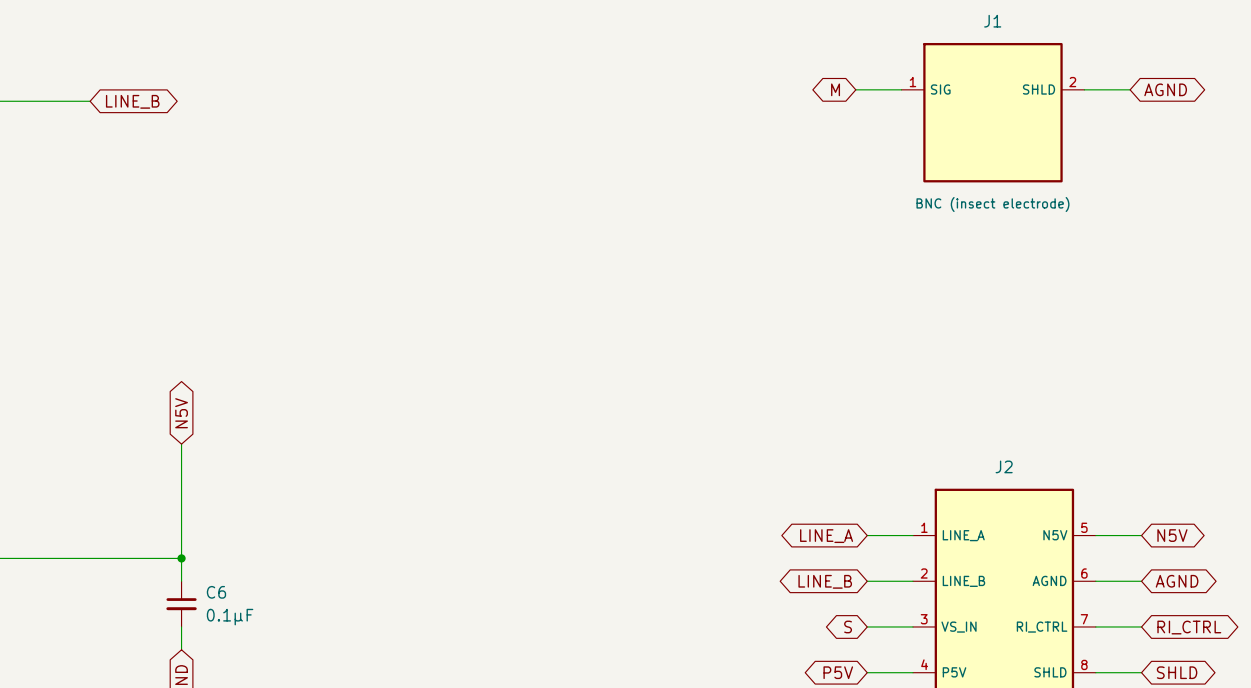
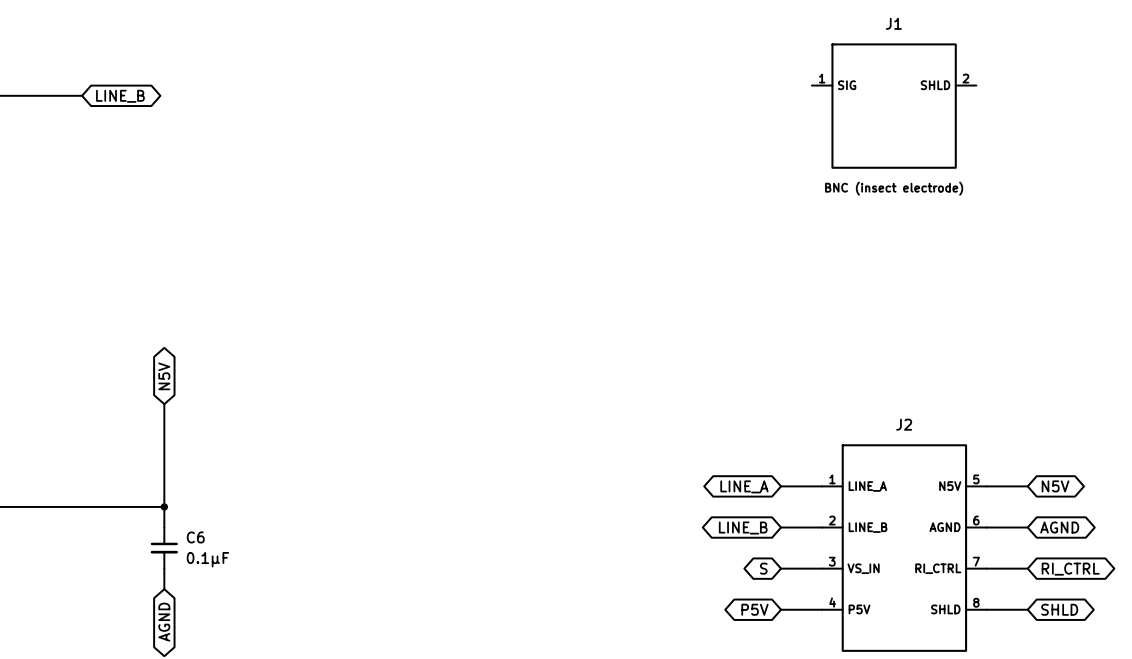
global label: M (835, 89) -> none
wire: (855, 89) (901, 89) -> none
wire: (1084, 89) (1130, 89) -> none
global label: AGND (1165, 89) -> none

